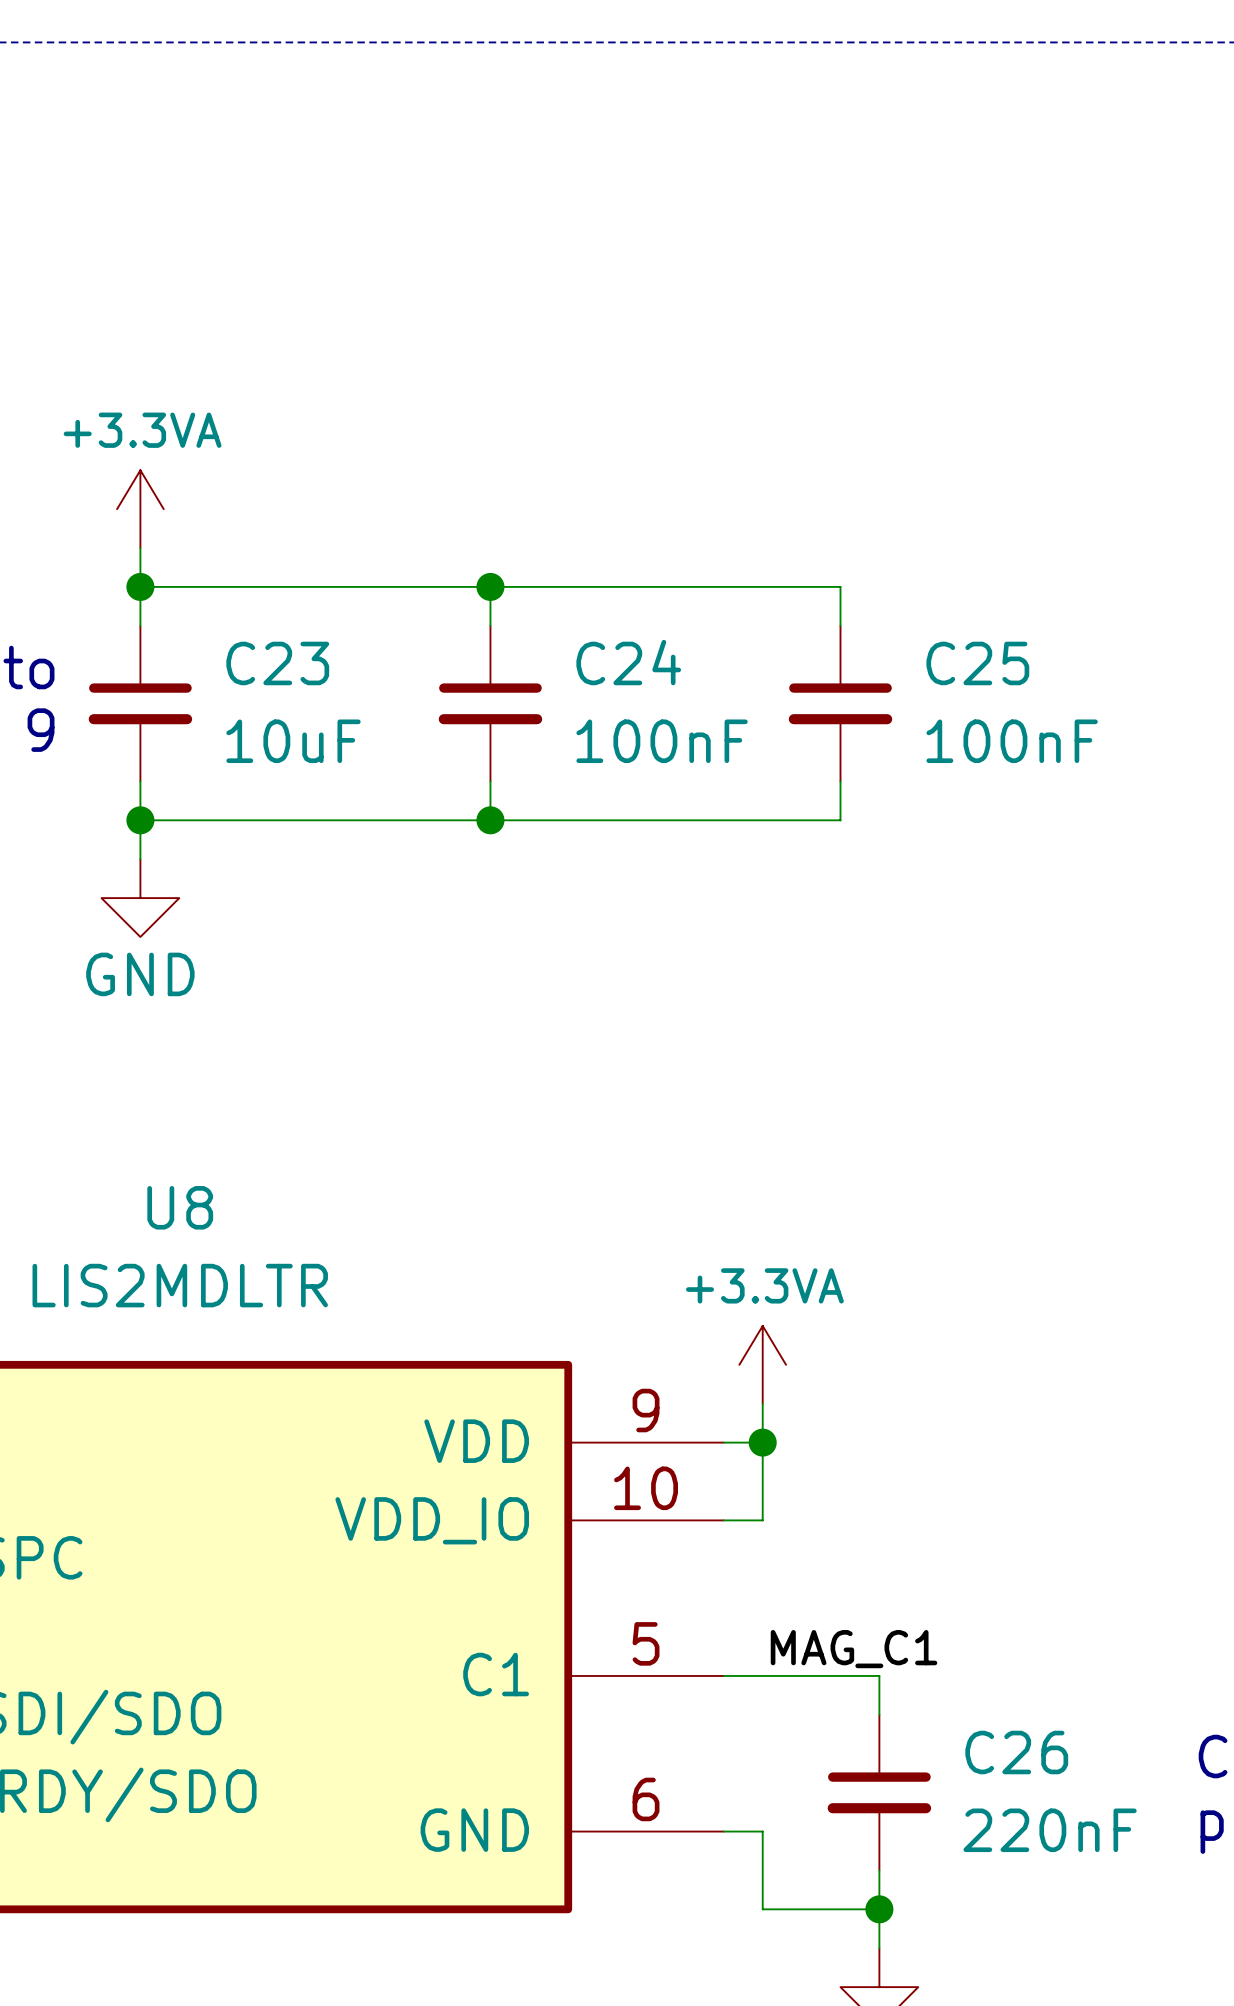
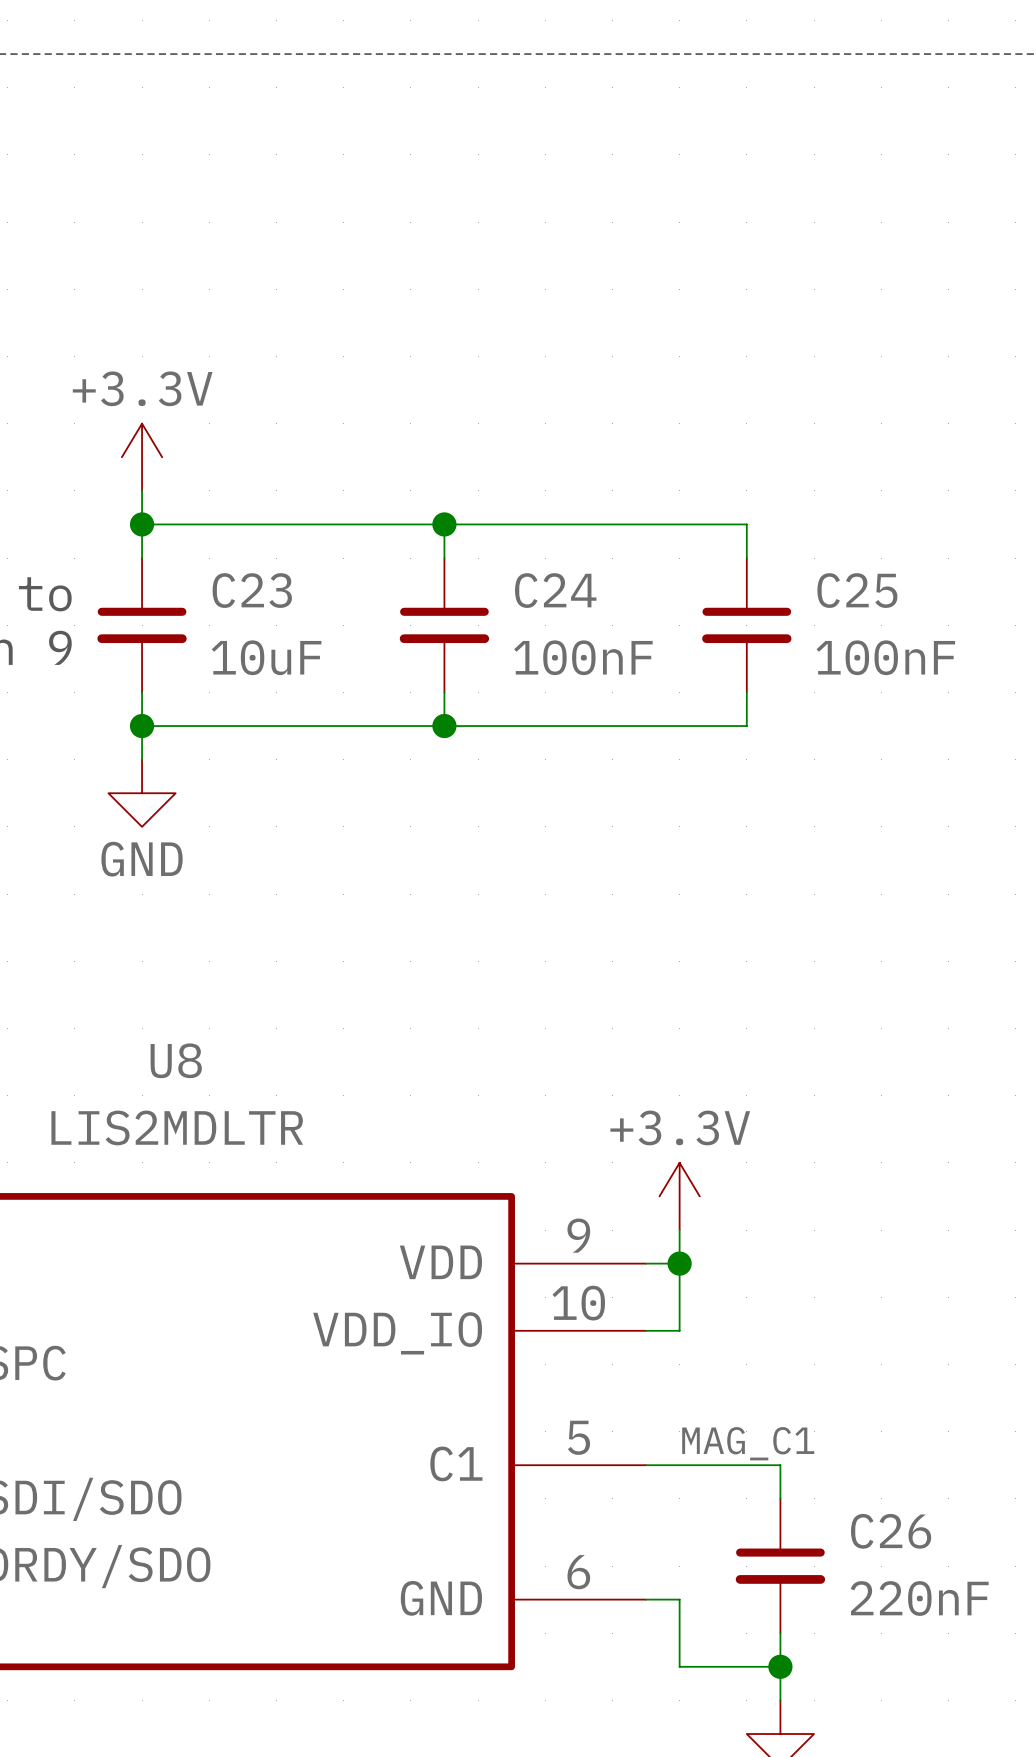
power symbol: +3.3VA (140, 509) -> +3.3V (142, 457)
power symbol: +3.3VA (762, 1364) -> +3.3V (679, 1196)

